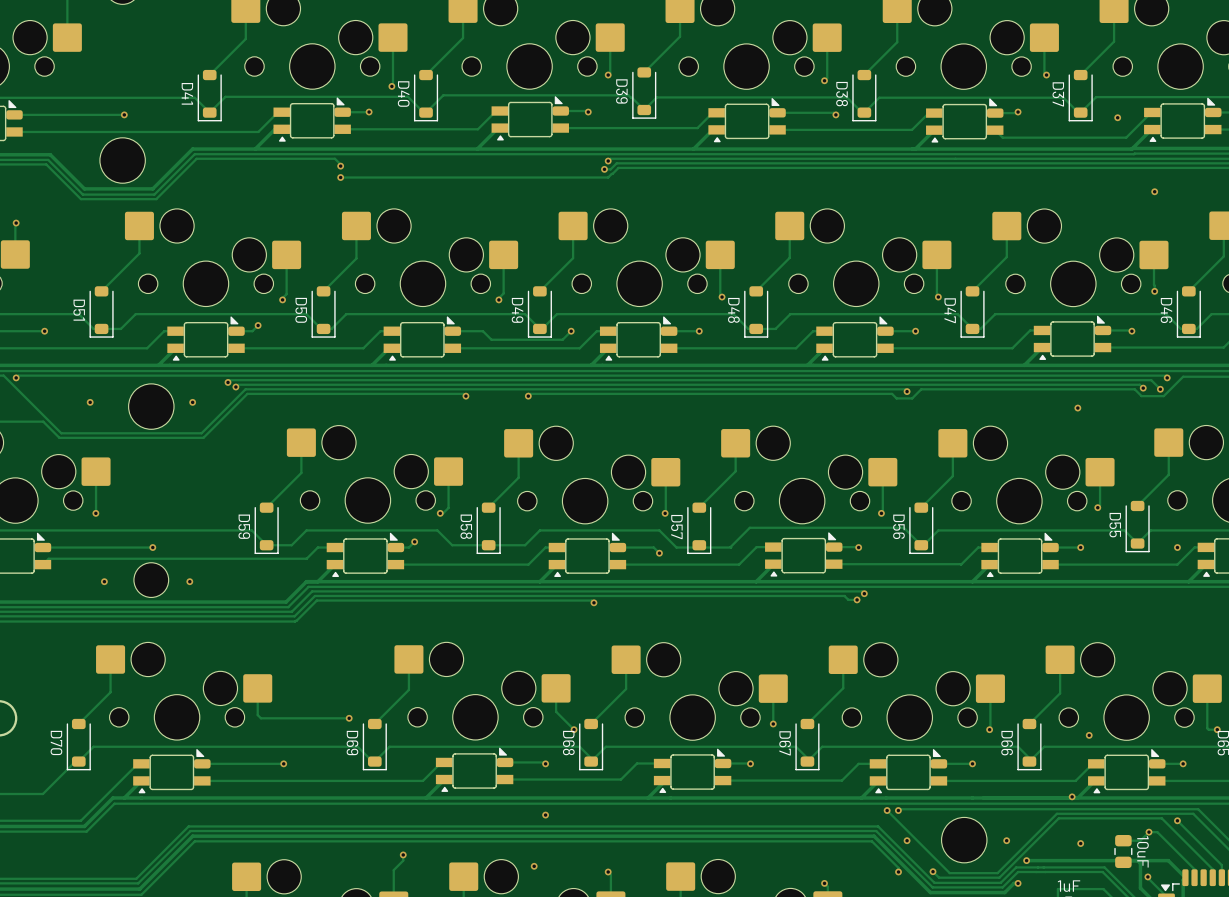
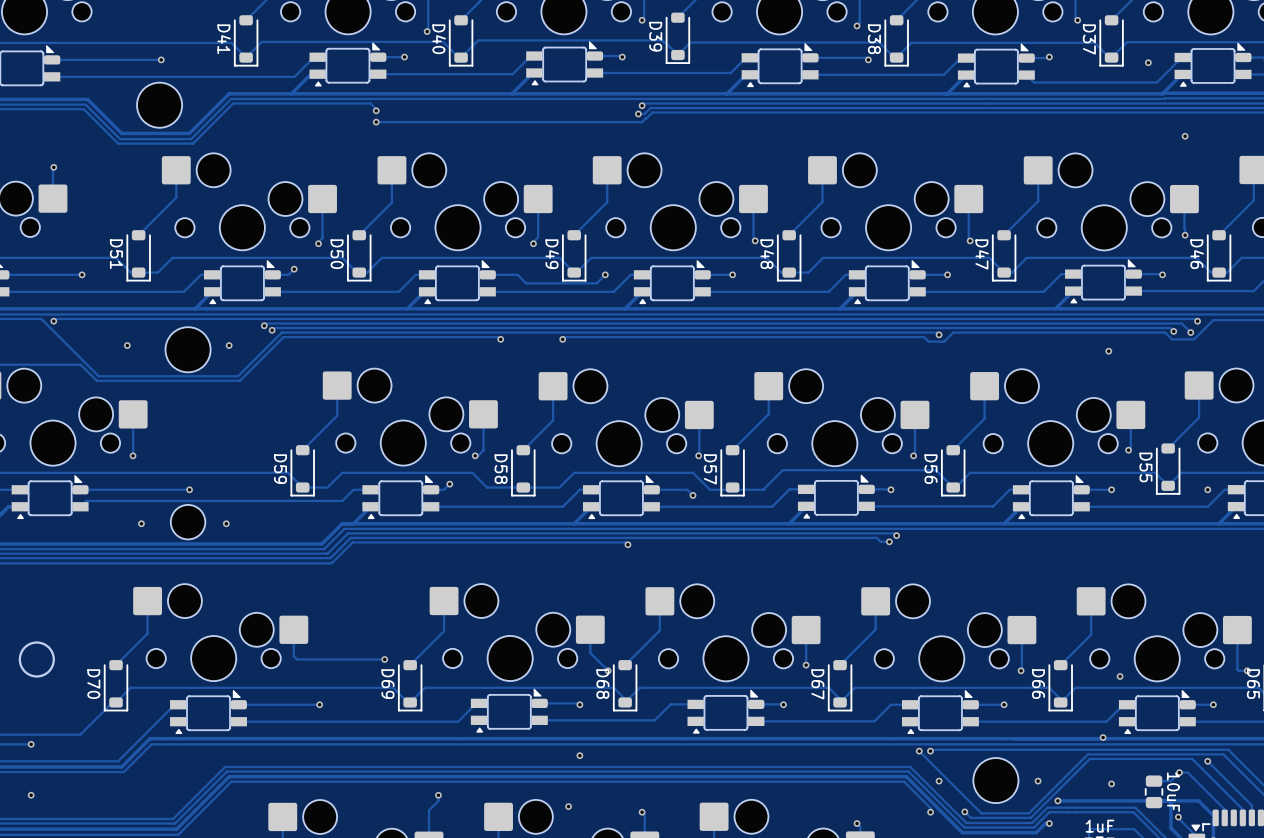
track: (444, 779) (426, 798) -> none
track: (141, 780) (124, 798) -> none
track: (1094, 780) (1077, 798) -> none
track: (878, 781) (861, 798) -> none
track: (662, 783) (648, 798) -> none

